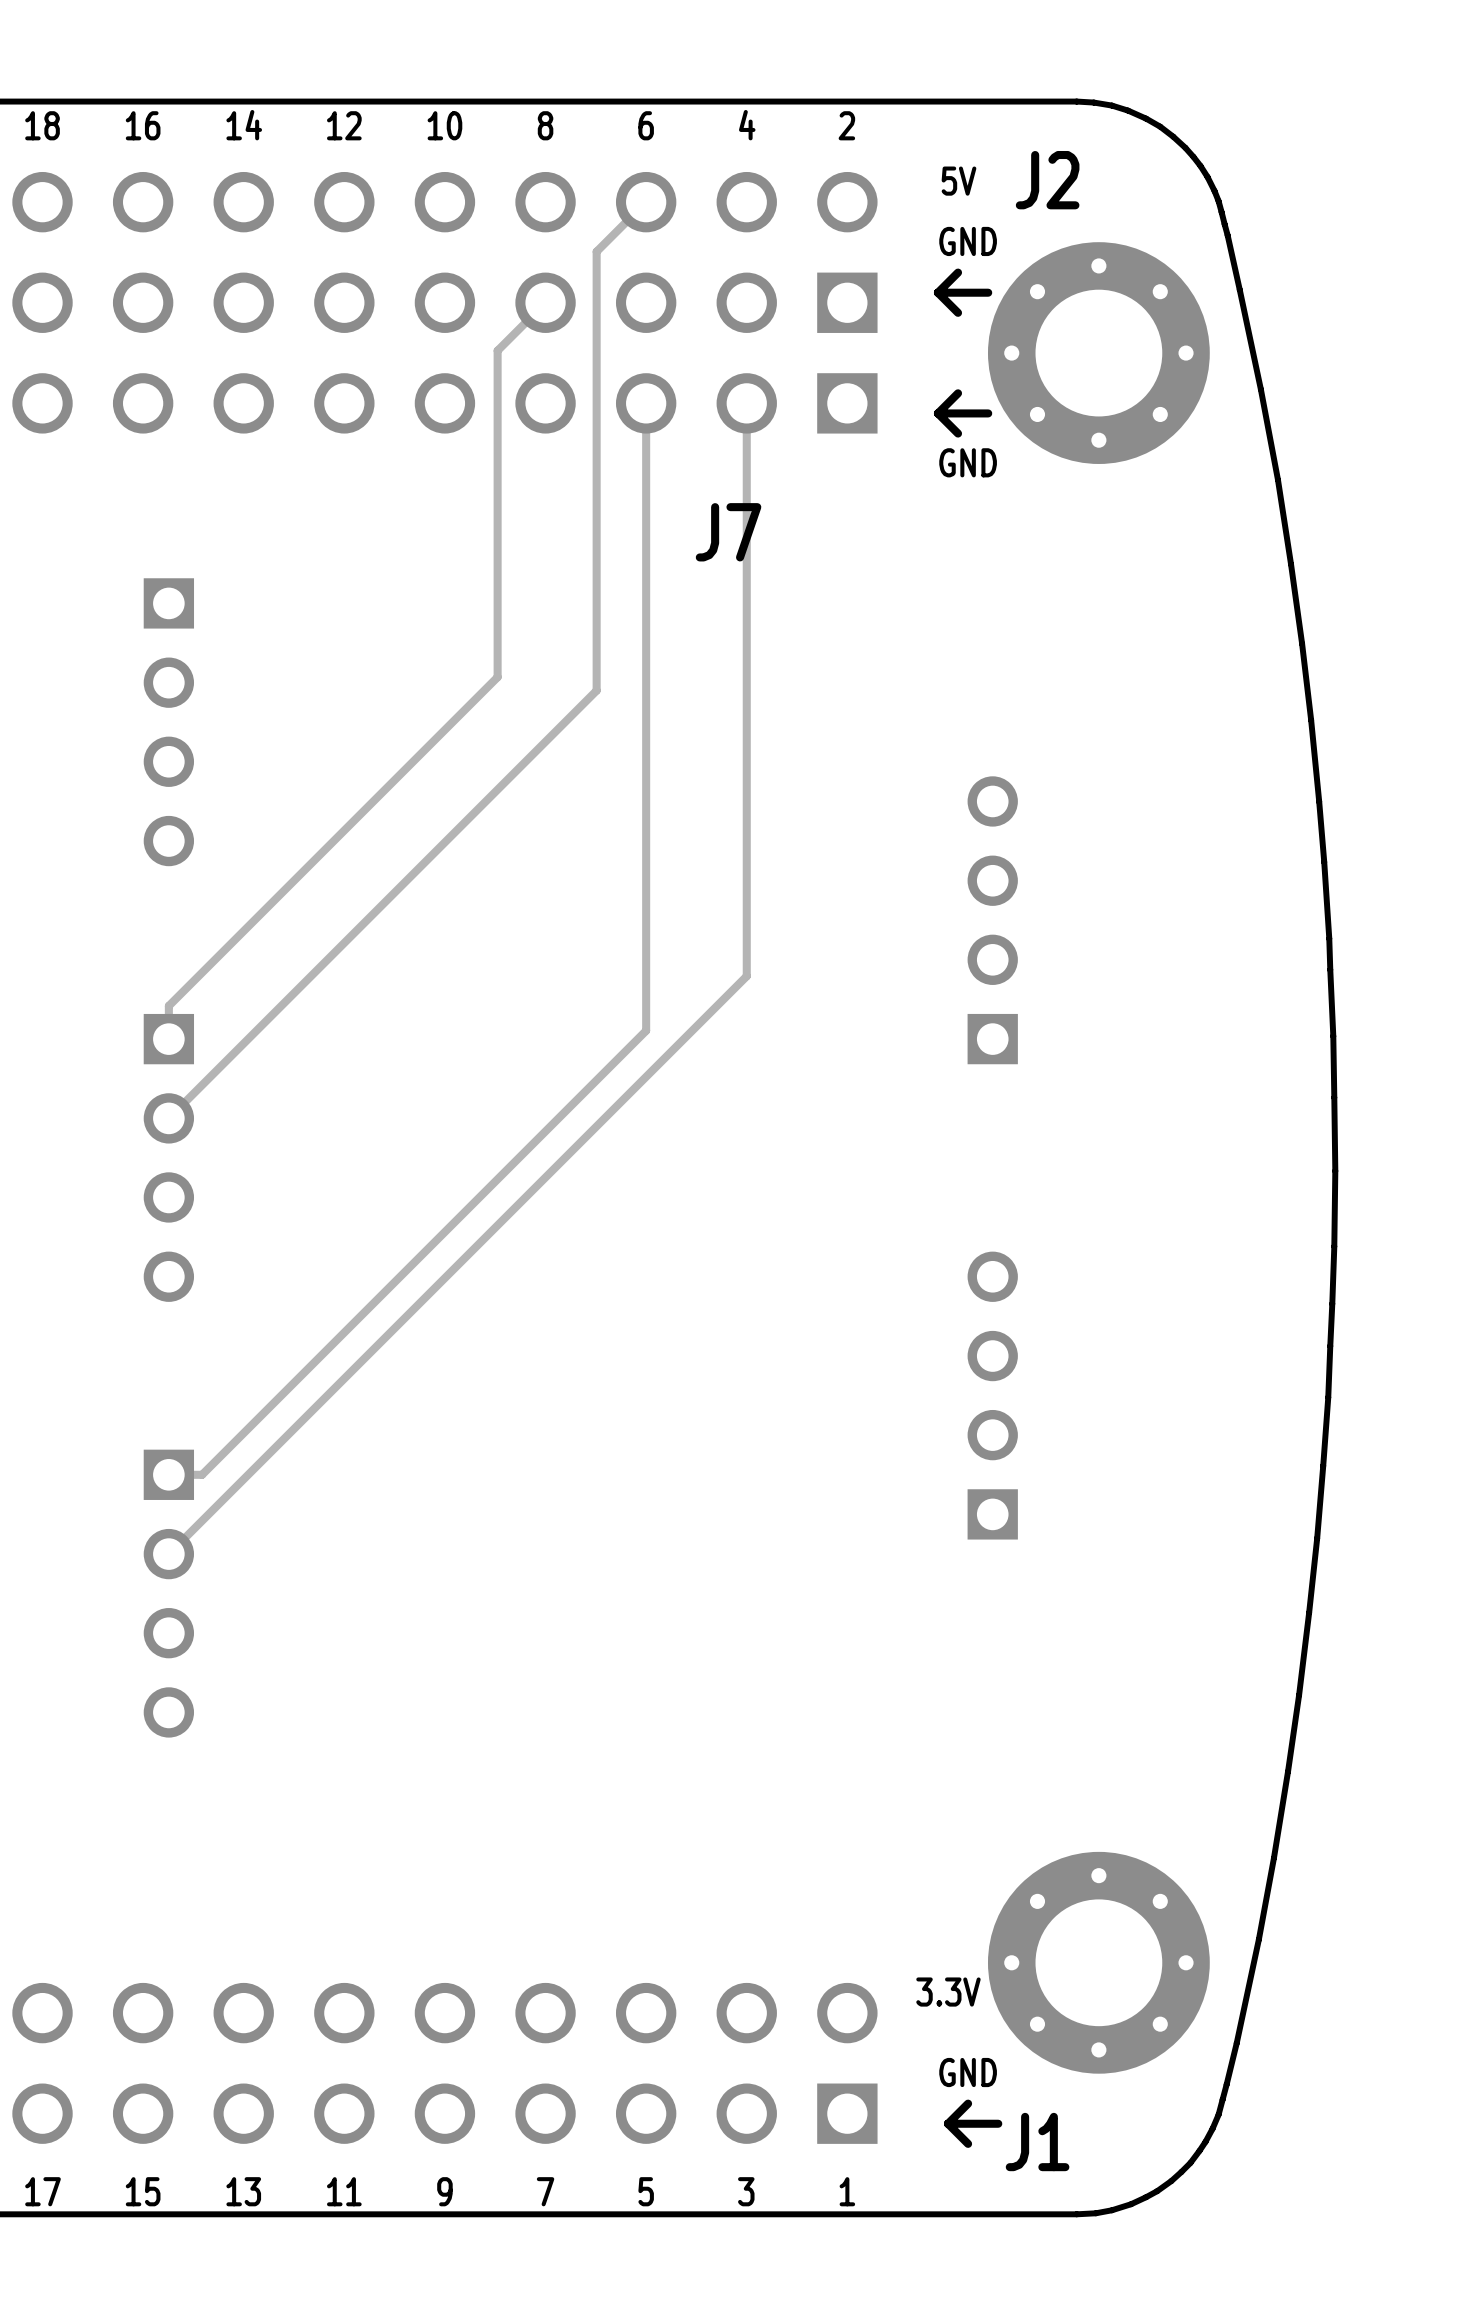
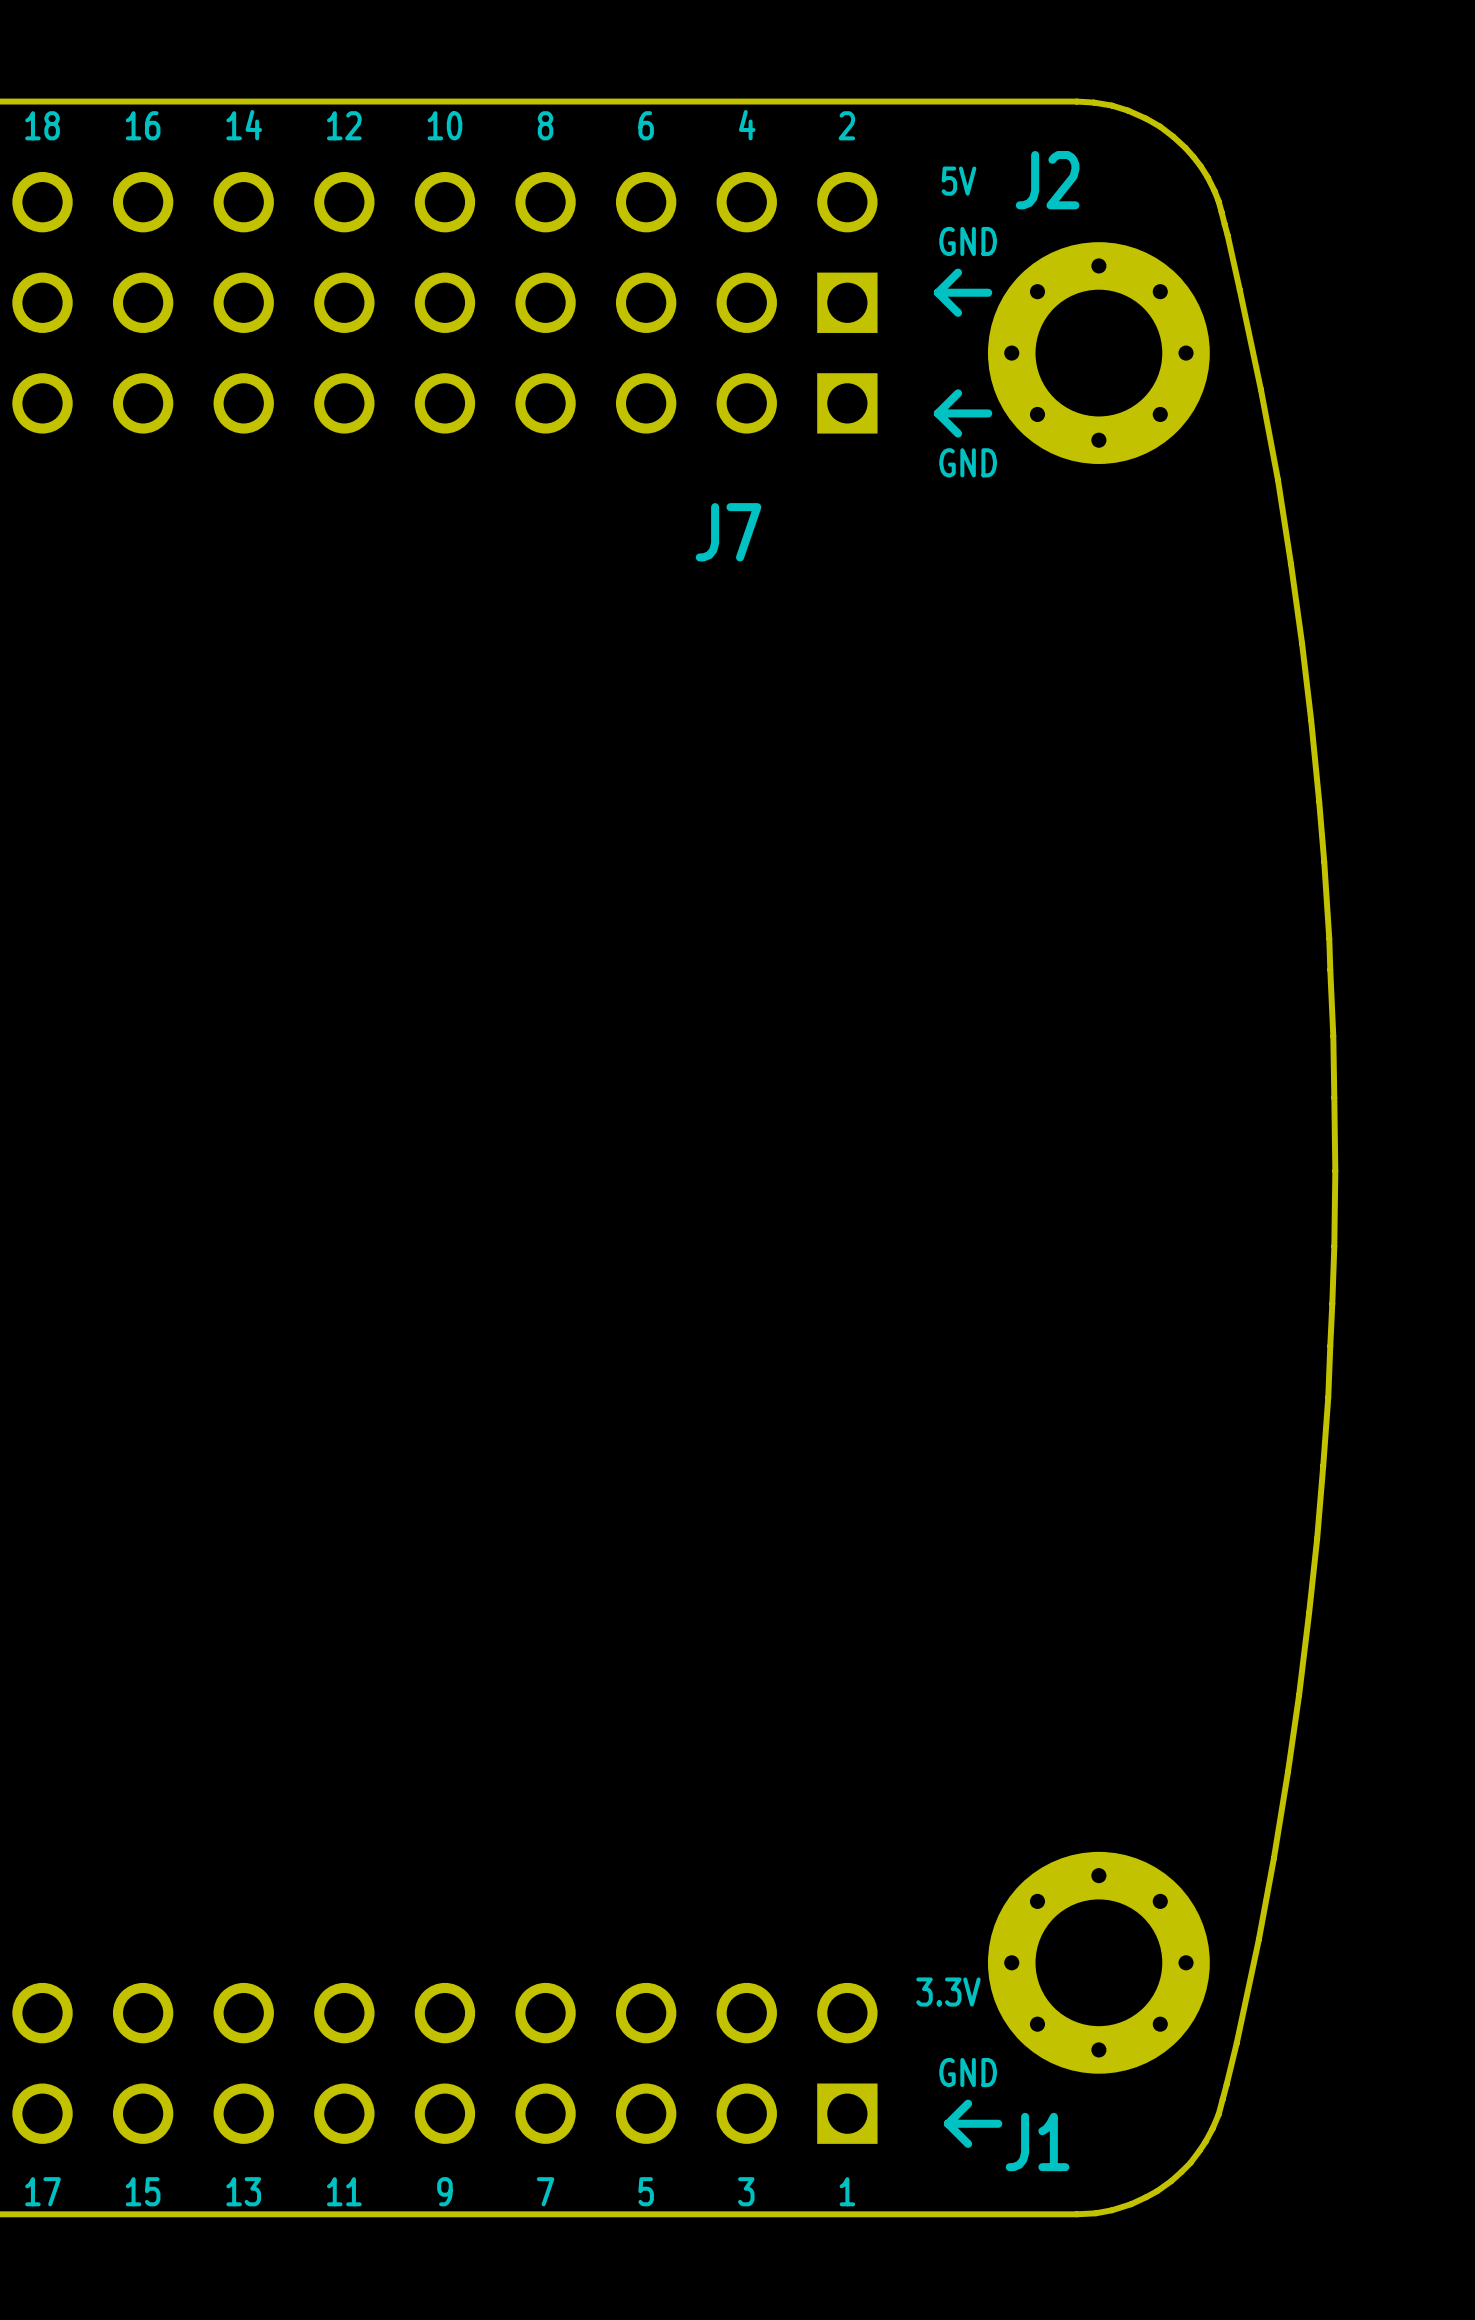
track: (646, 202) (596, 251) (596, 690) (168, 1118) -> none
track: (545, 302) (497, 350) (497, 677) (168, 1005) (168, 1039) -> none
track: (646, 403) (646, 1030) (202, 1474) (168, 1474) -> none
track: (746, 403) (746, 976) (168, 1554) -> none
part: (168, 722) -> none
part: (992, 920) -> none
part: (168, 1157) -> none
part: (992, 1395) -> none
part: (168, 1593) -> none

